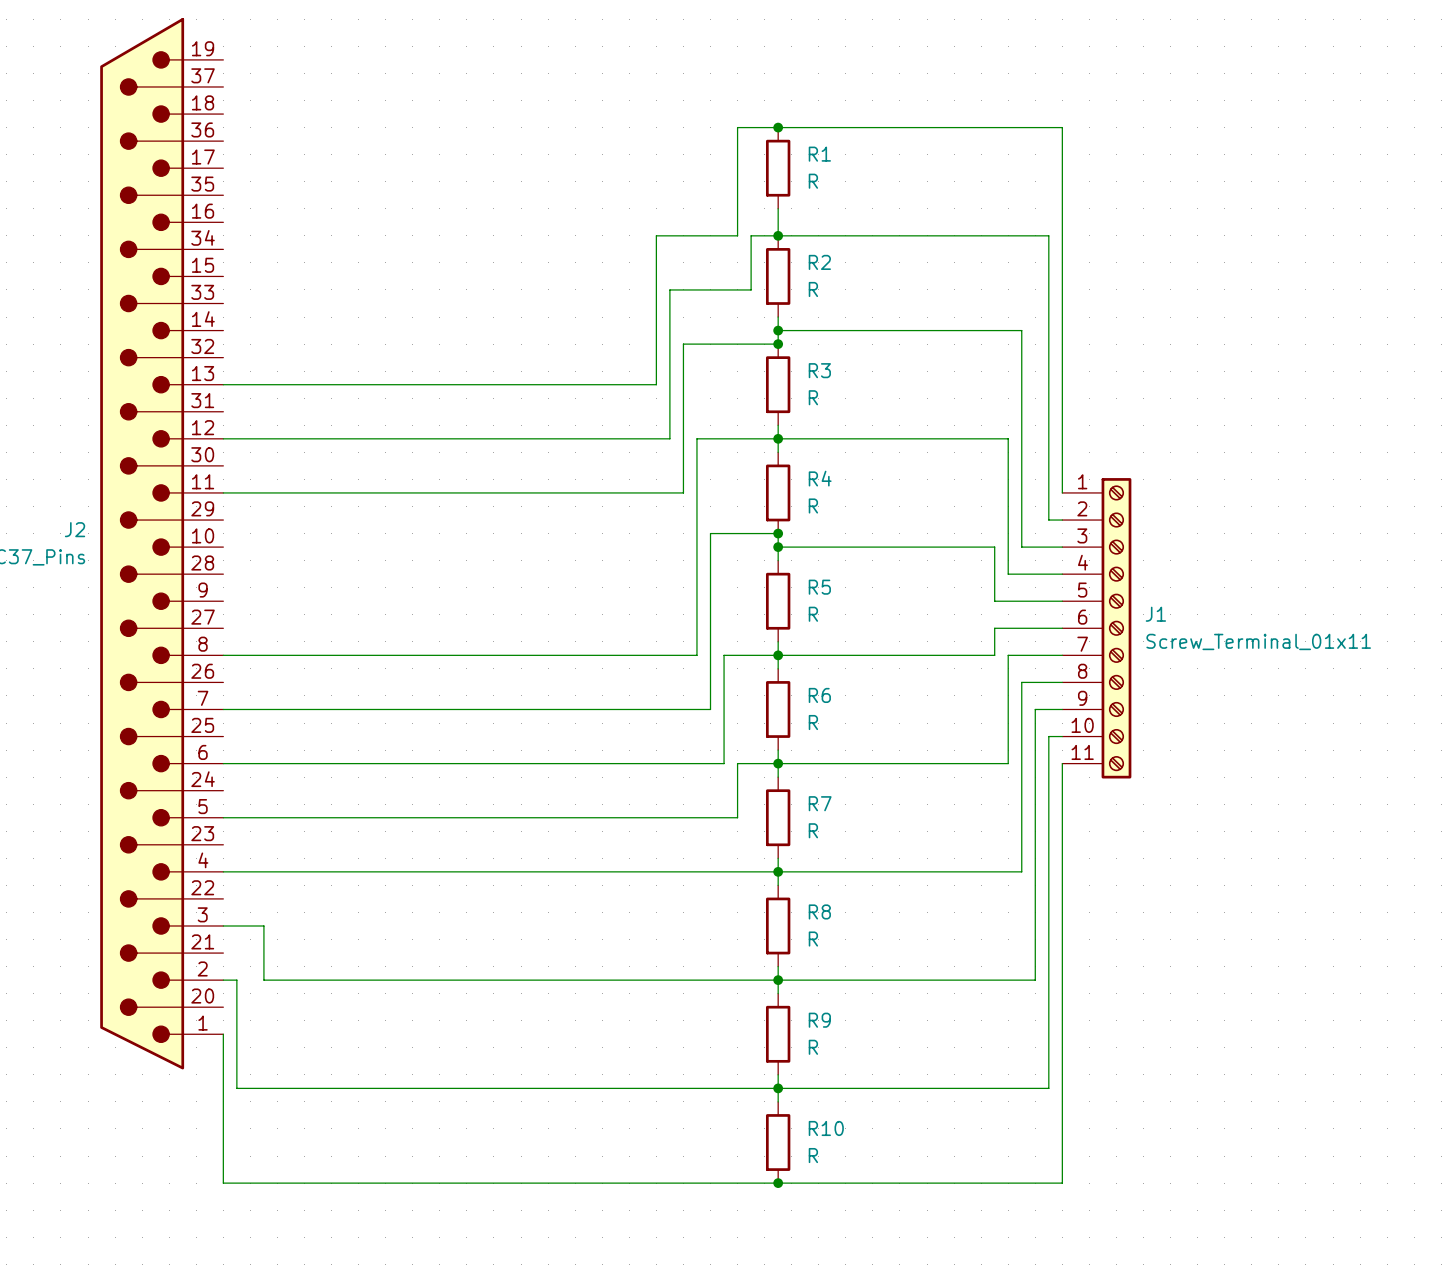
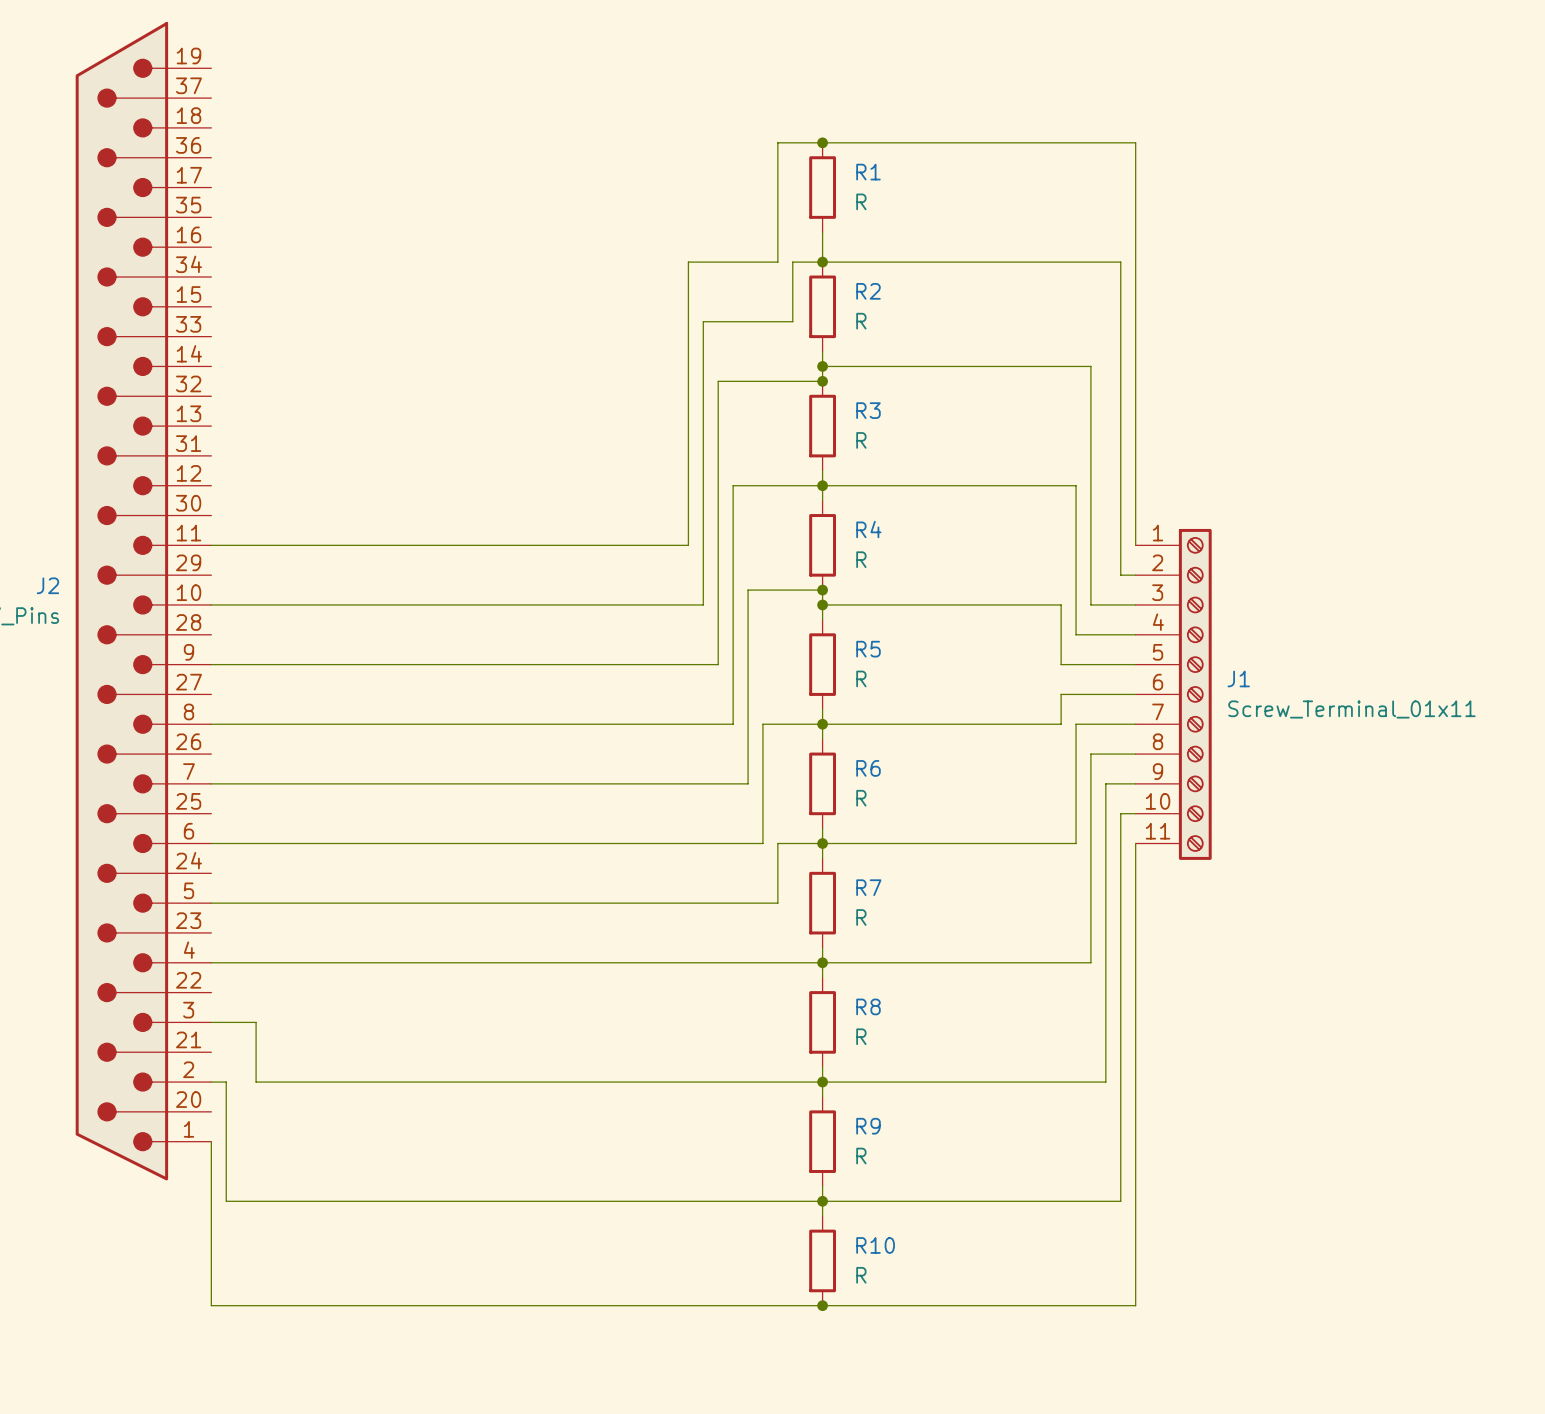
wire: (223, 384) (656, 384) -> none
wire: (223, 438) (669, 438) -> (211, 604) (703, 604) (703, 485)
wire: (656, 492) (683, 492) -> (688, 545) (688, 426)
wire: none -> (718, 545) (718, 664) (211, 664)

